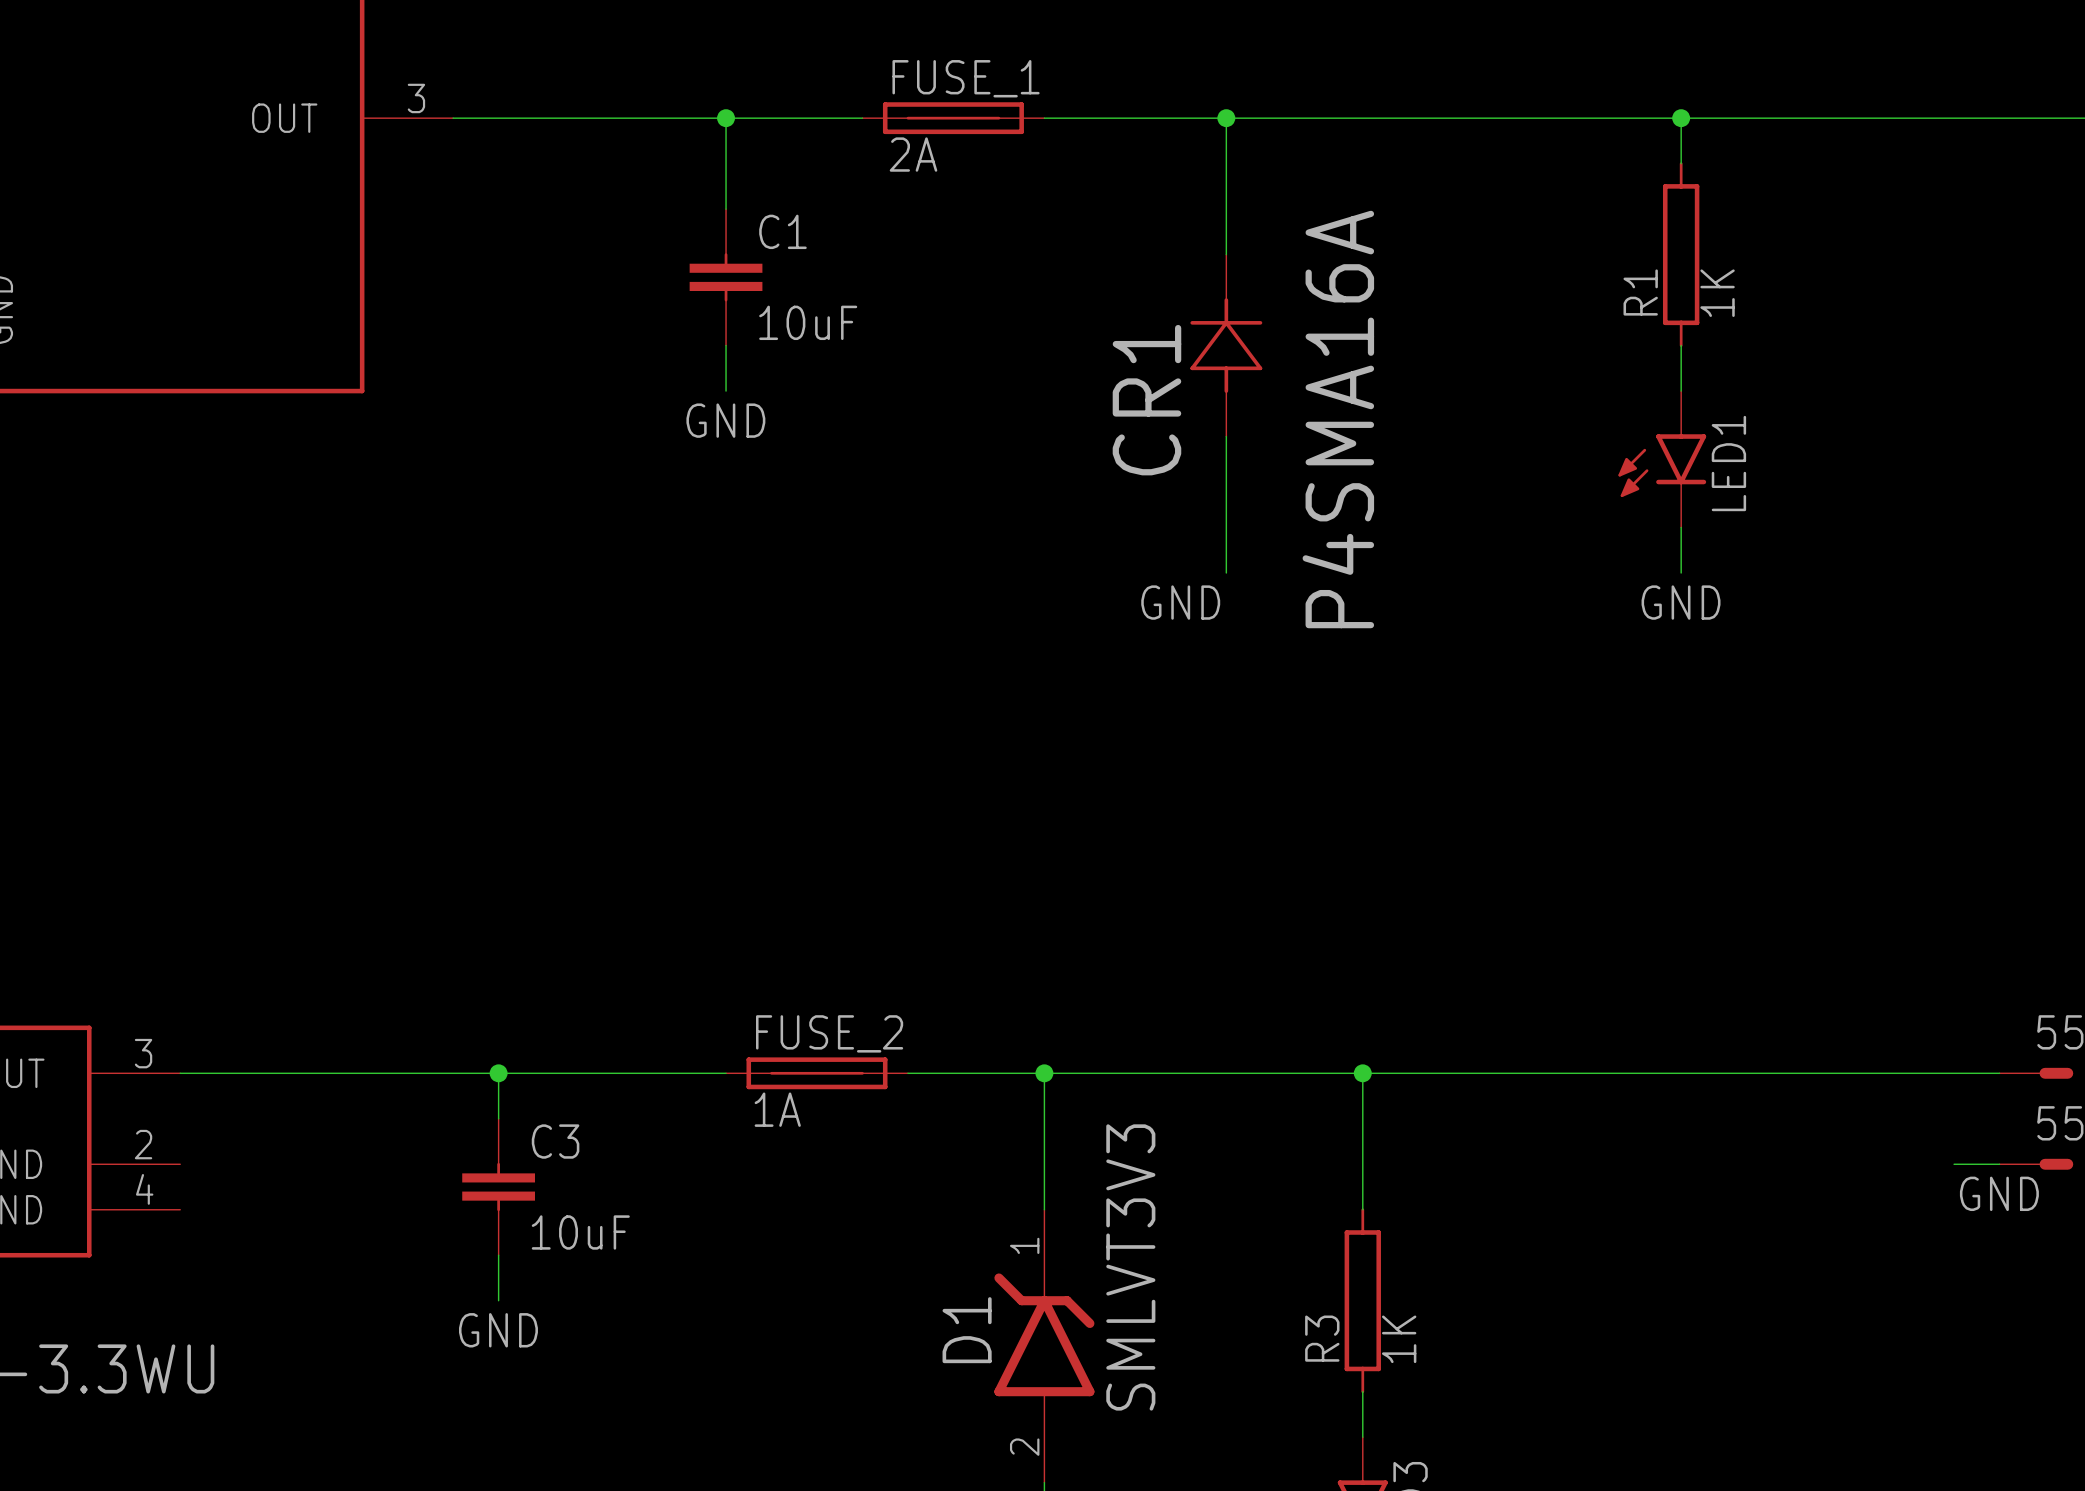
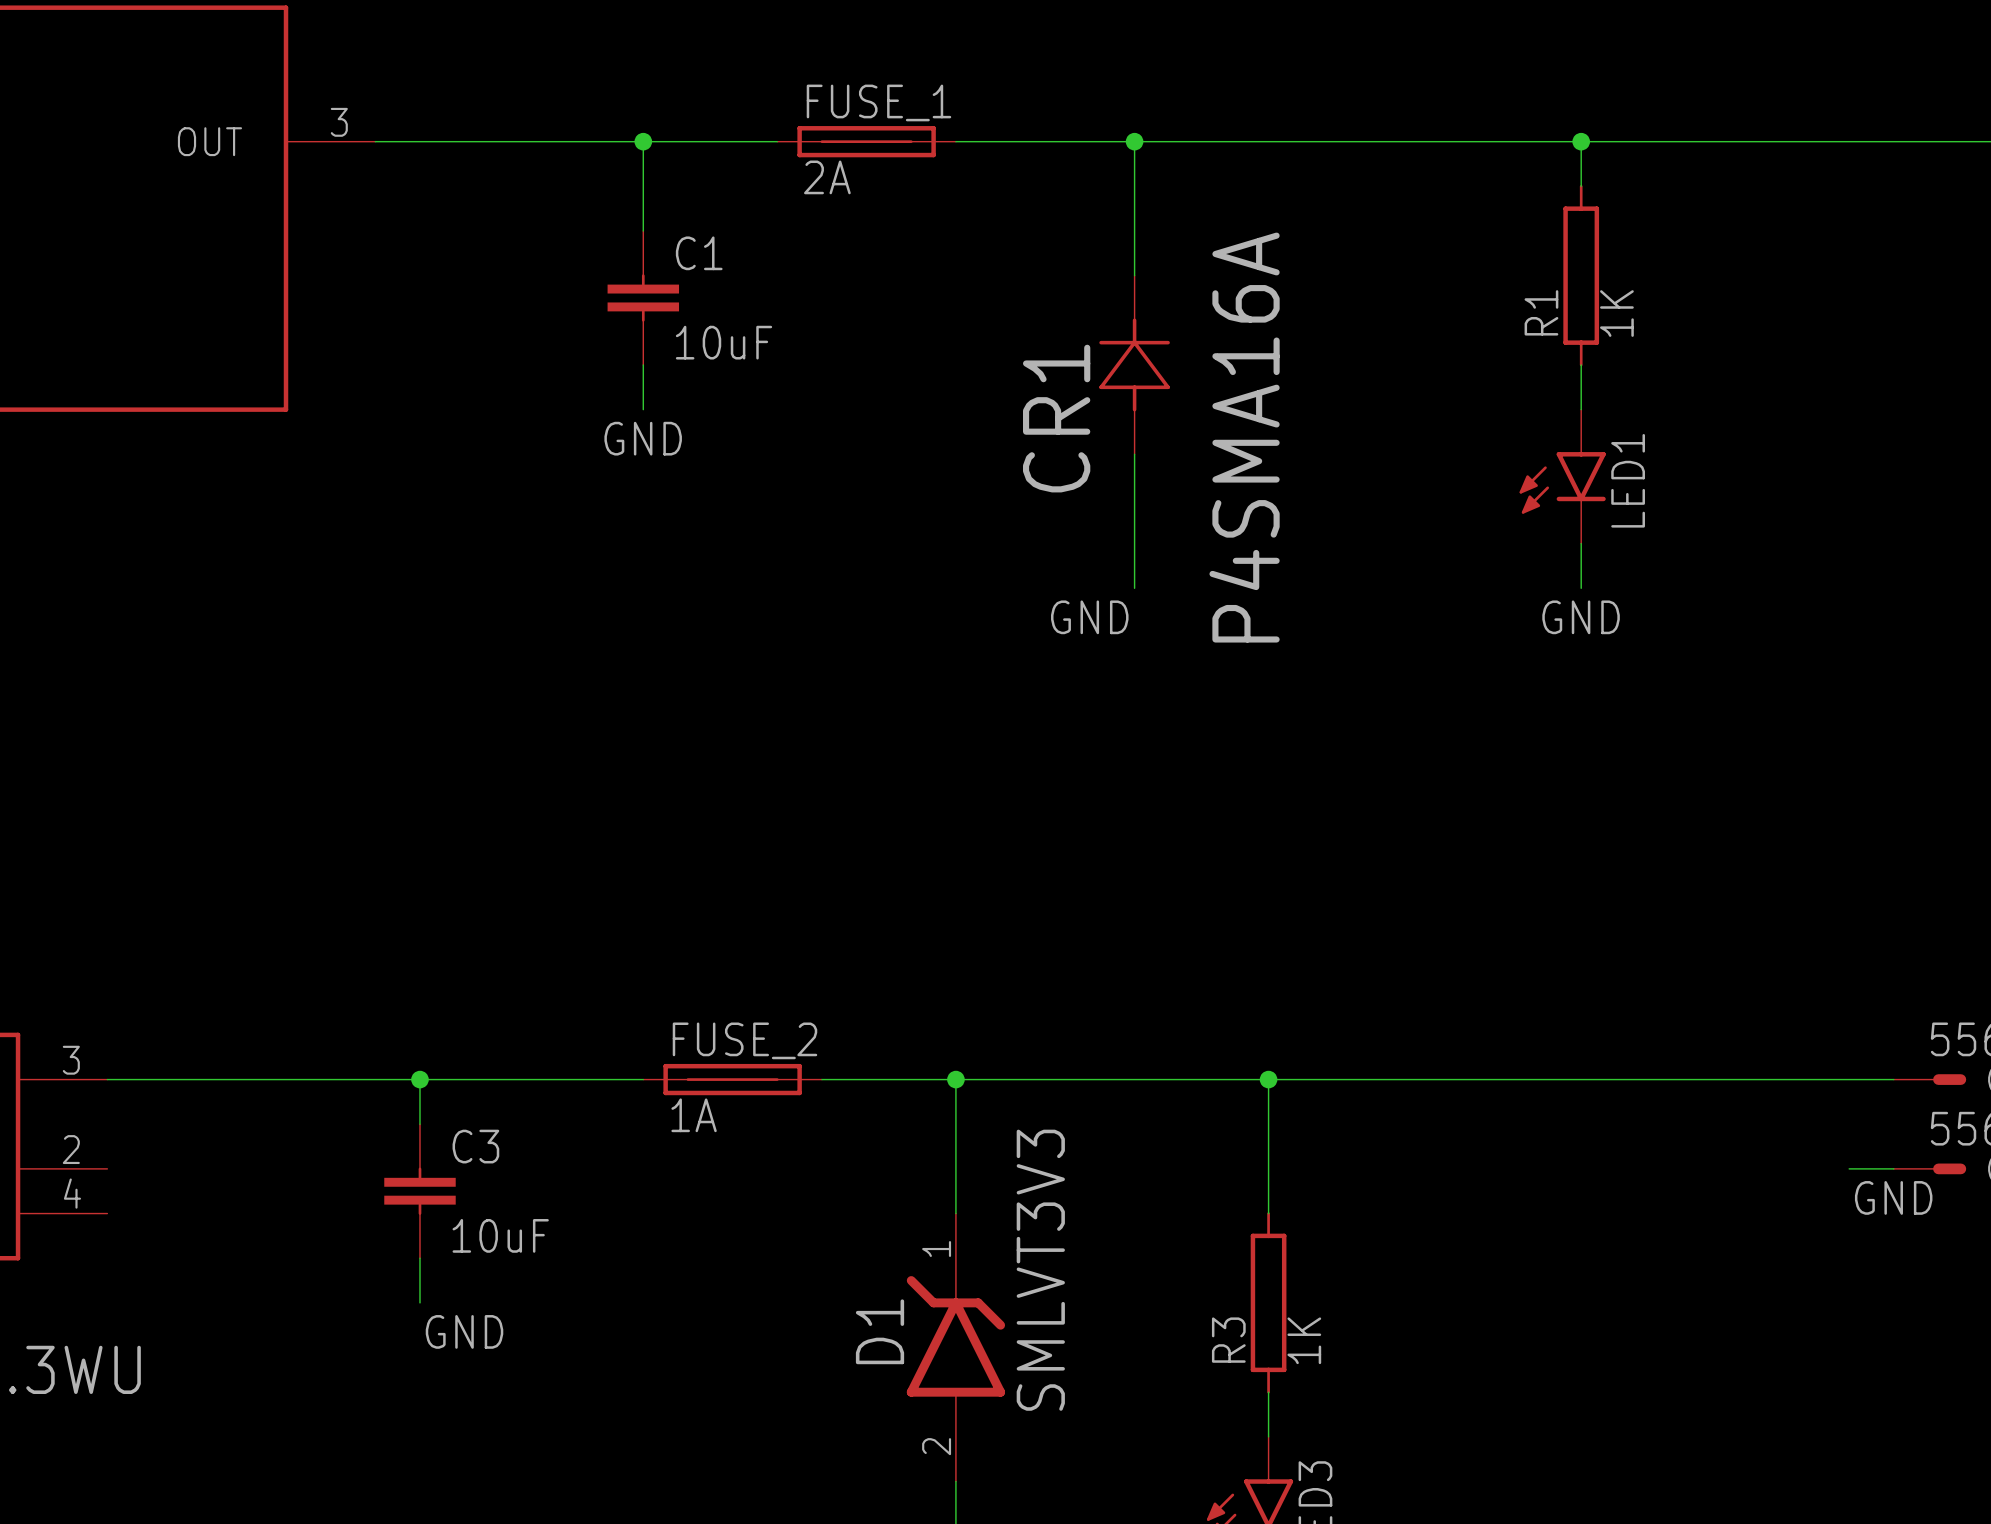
label position: GND (498, 1330) -> GND (464, 1331)

